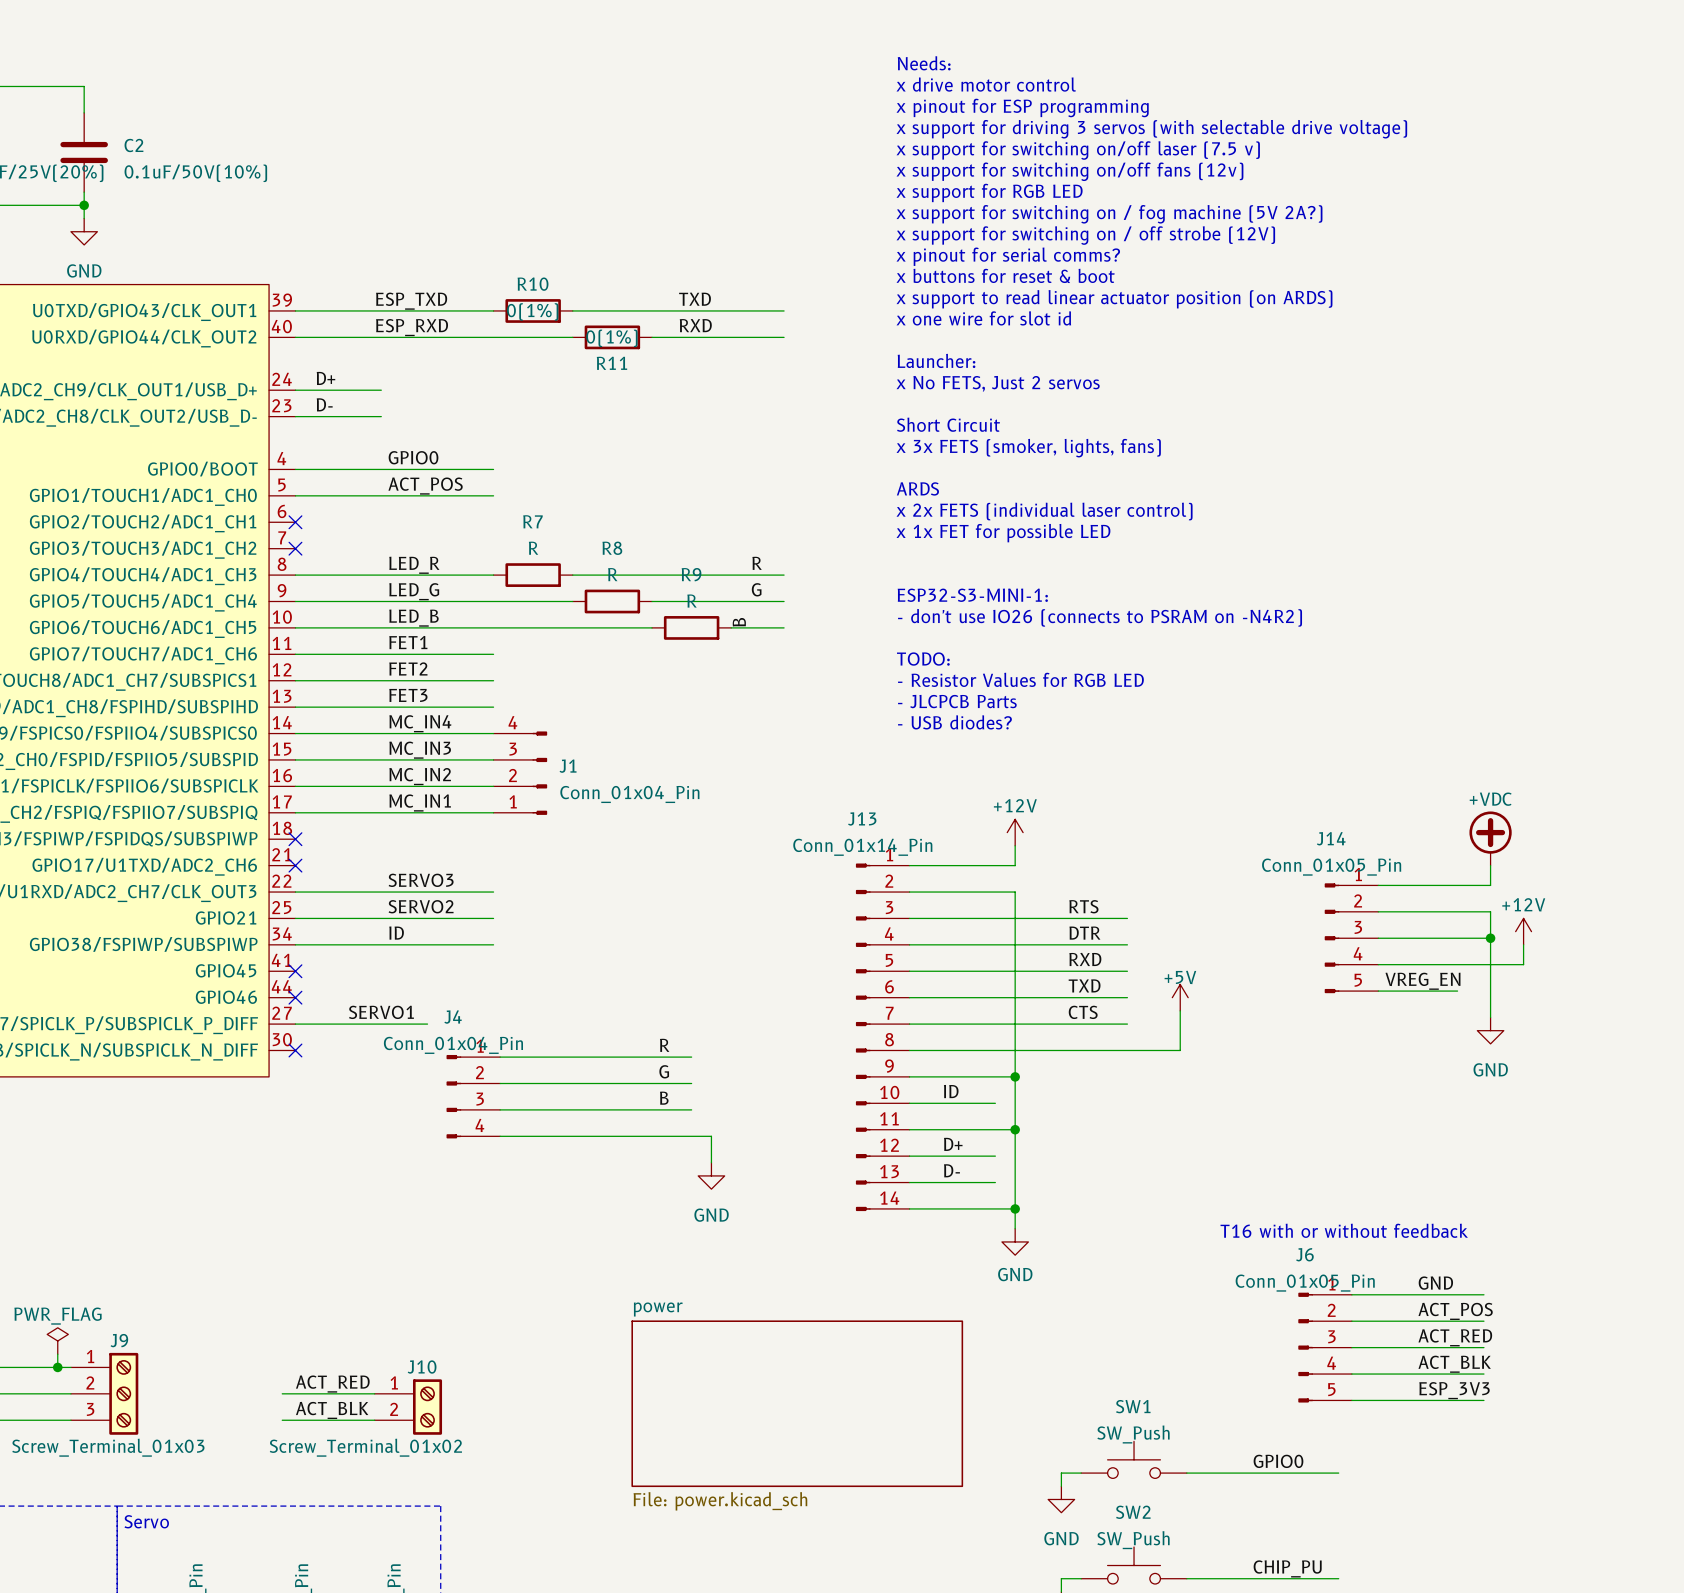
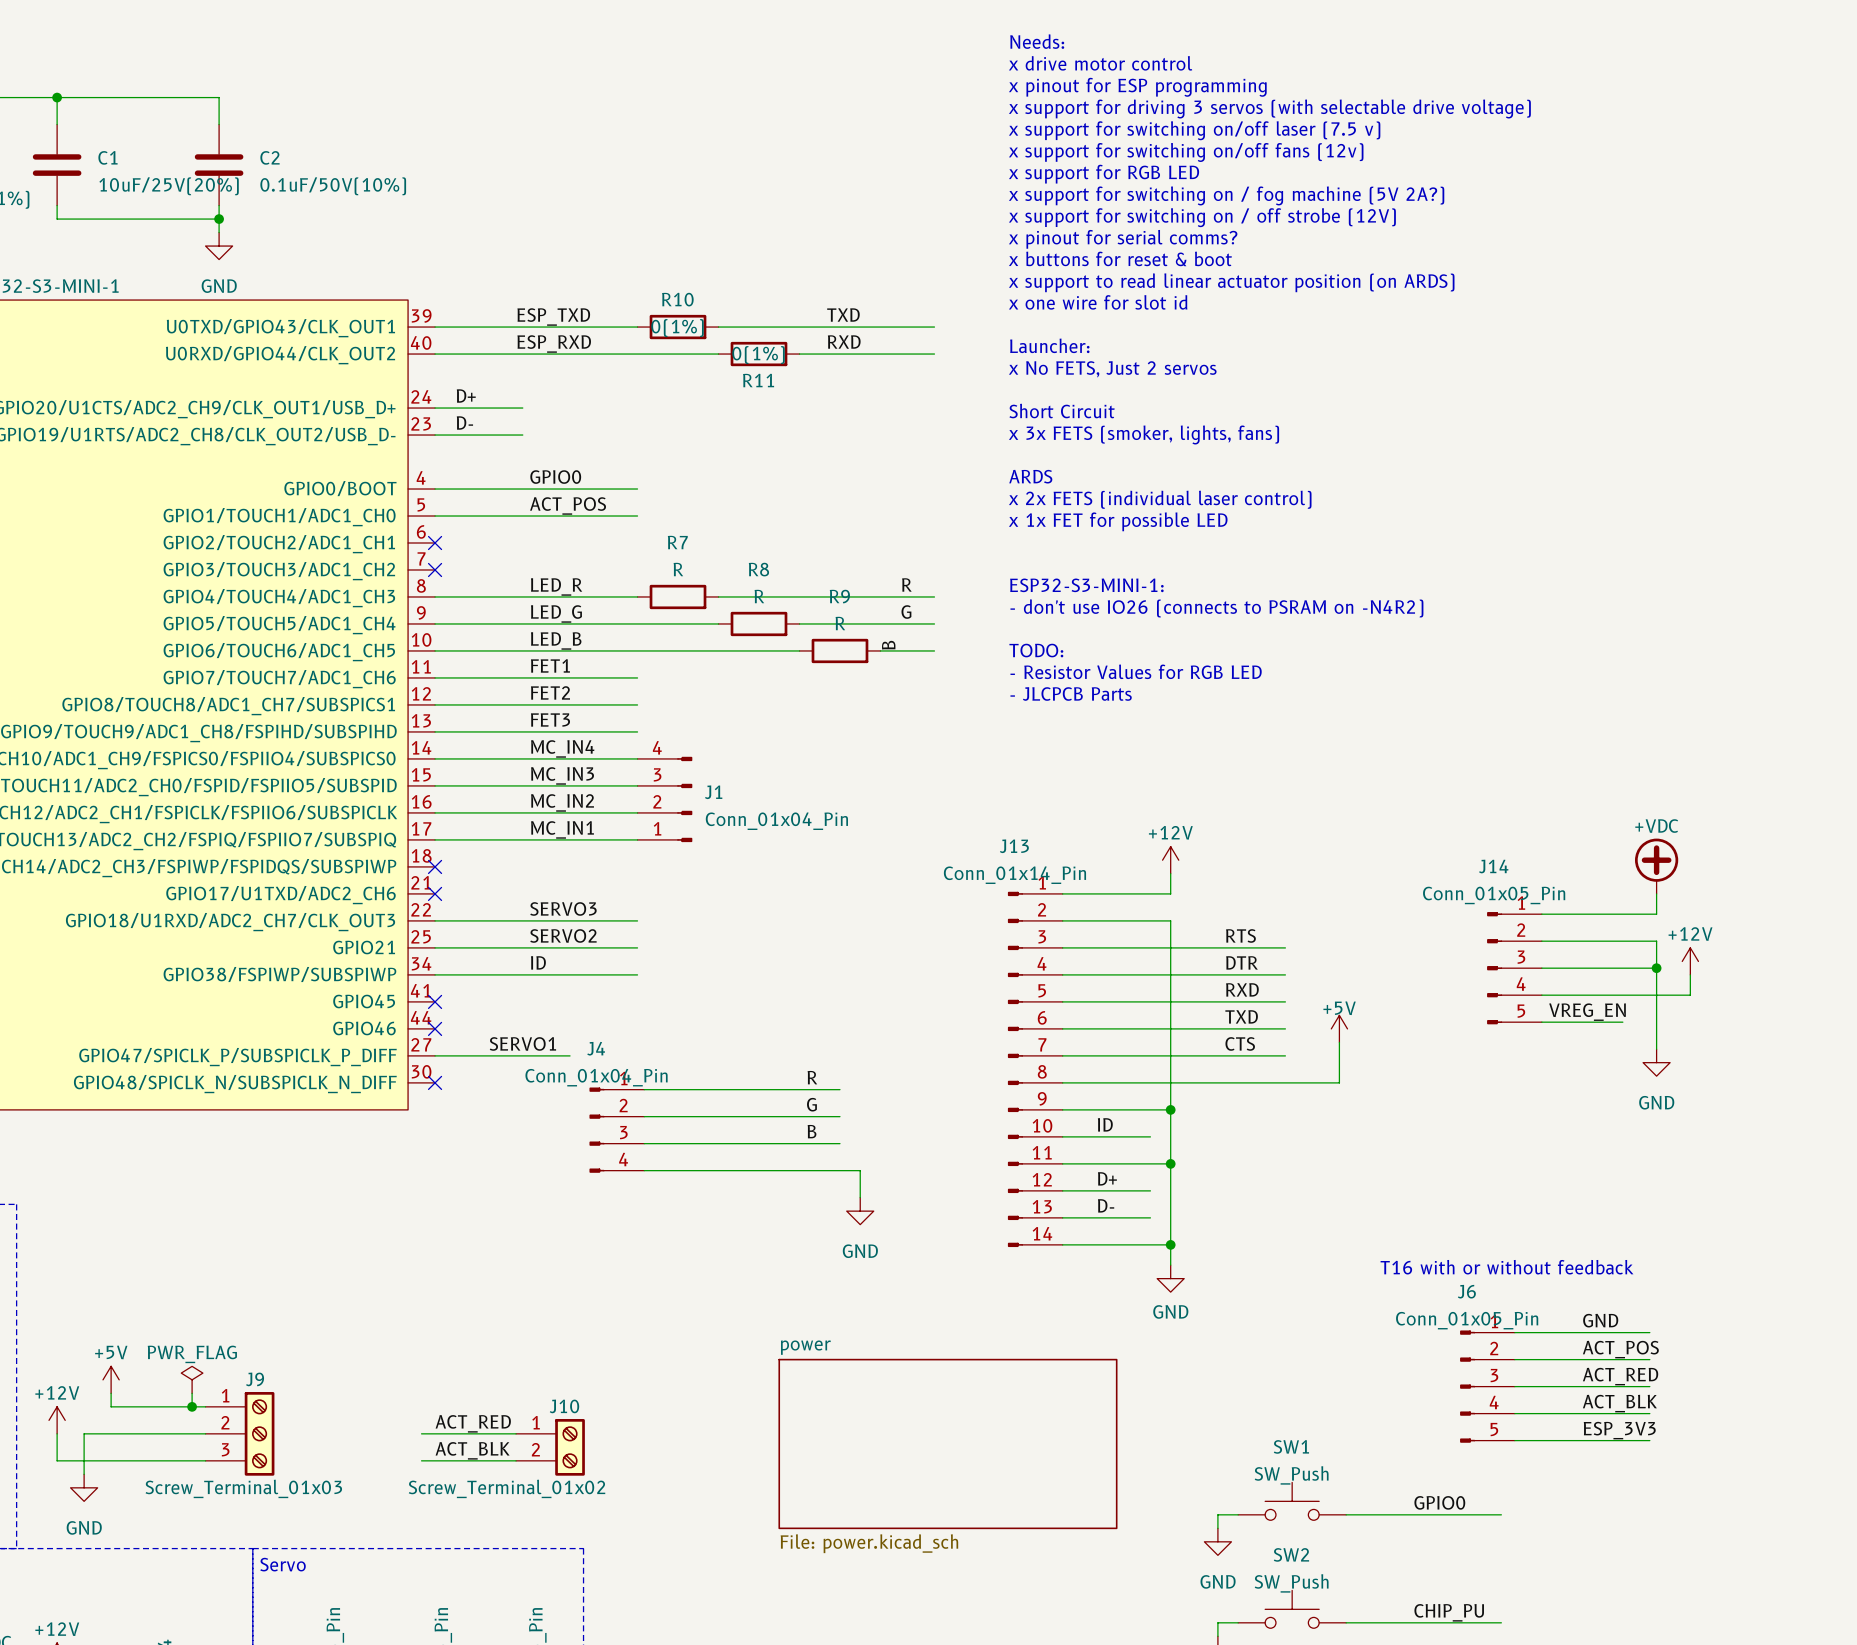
text position: Needs: (924, 63) -> Needs: (1037, 41)
text position: x drive motor control (986, 84) -> x drive motor control (1100, 63)
text position: x pinout for ESP programming (1022, 107) -> x pinout for ESP programming (1137, 87)
text position: x support for driving 3 servos (with selectable drive voltage) (1151, 129) -> x support for driving 3 servos (with selectable drive voltage) (1269, 109)
text position: x support for switching on/off laser (7.5 v) (1078, 150) -> x support for switching on/off laser (7.5 v) (1194, 130)
text position: x support for switching on/off fans (12v) (1069, 171) -> x support for switching on/off fans (12v) (1186, 152)
text position: x support for RGB LED (989, 192) -> x support for RGB LED (1104, 174)
text position: x support for switching on / fog machine (5V 2A?) (1109, 214) -> x support for switching on / fog machine (5V 2A?) (1226, 195)
text position: x support for switching on / off strobe (12V) (1085, 235) -> x support for switching on / off strobe (12V) (1202, 217)
text position: x pinout for serial comms? (1008, 256) -> x pinout for serial comms? (1123, 239)
text position: x buttons for reset & boot (1005, 275) -> x buttons for reset & boot (1120, 258)
text position: x support to read linear actuator position (on ARDS) (1114, 299) -> x support to read linear actuator position (on ARDS) (1231, 282)
text position: x one wire for slot id (983, 318) -> x one wire for slot id (1098, 302)
text position: Launcher: (936, 360) -> Launcher: (1049, 345)
text position: x No FETS, Just 2 servos (998, 383) -> x No FETS, Just 2 servos (1112, 369)
text position: Short Circuit (948, 424) -> Short Circuit (1062, 411)
text position: x 3x FETS (smoker, lights, fans) (1028, 448) -> x 3x FETS (smoker, lights, fans) (1144, 434)
text position: ARDS (917, 488) -> ARDS (1030, 476)
text position: x 2x FETS (individual laser control) (1044, 511) -> x 2x FETS (individual laser control) (1160, 499)
text position: x 1x FET for possible LED (1003, 533) -> x 1x FET for possible LED (1118, 521)
text position: ESP32-S3-MINI-1: (972, 595) -> ESP32-S3-MINI-1: (1086, 585)
text position: - don't use IO26 (connects to PSRAM on -N4R2) (1100, 617) -> - don't use IO26 (connects to PSRAM on -N4R2) (1216, 608)
text position: TODO: (923, 659) -> TODO: (1036, 650)
text position: - Resistor Values for RGB LED (1020, 679) -> - Resistor Values for RGB LED (1136, 671)
text position: - JLCPCB Parts (957, 701) -> - JLCPCB Parts (1071, 693)
text: - USB diodes? (954, 722) -> none

